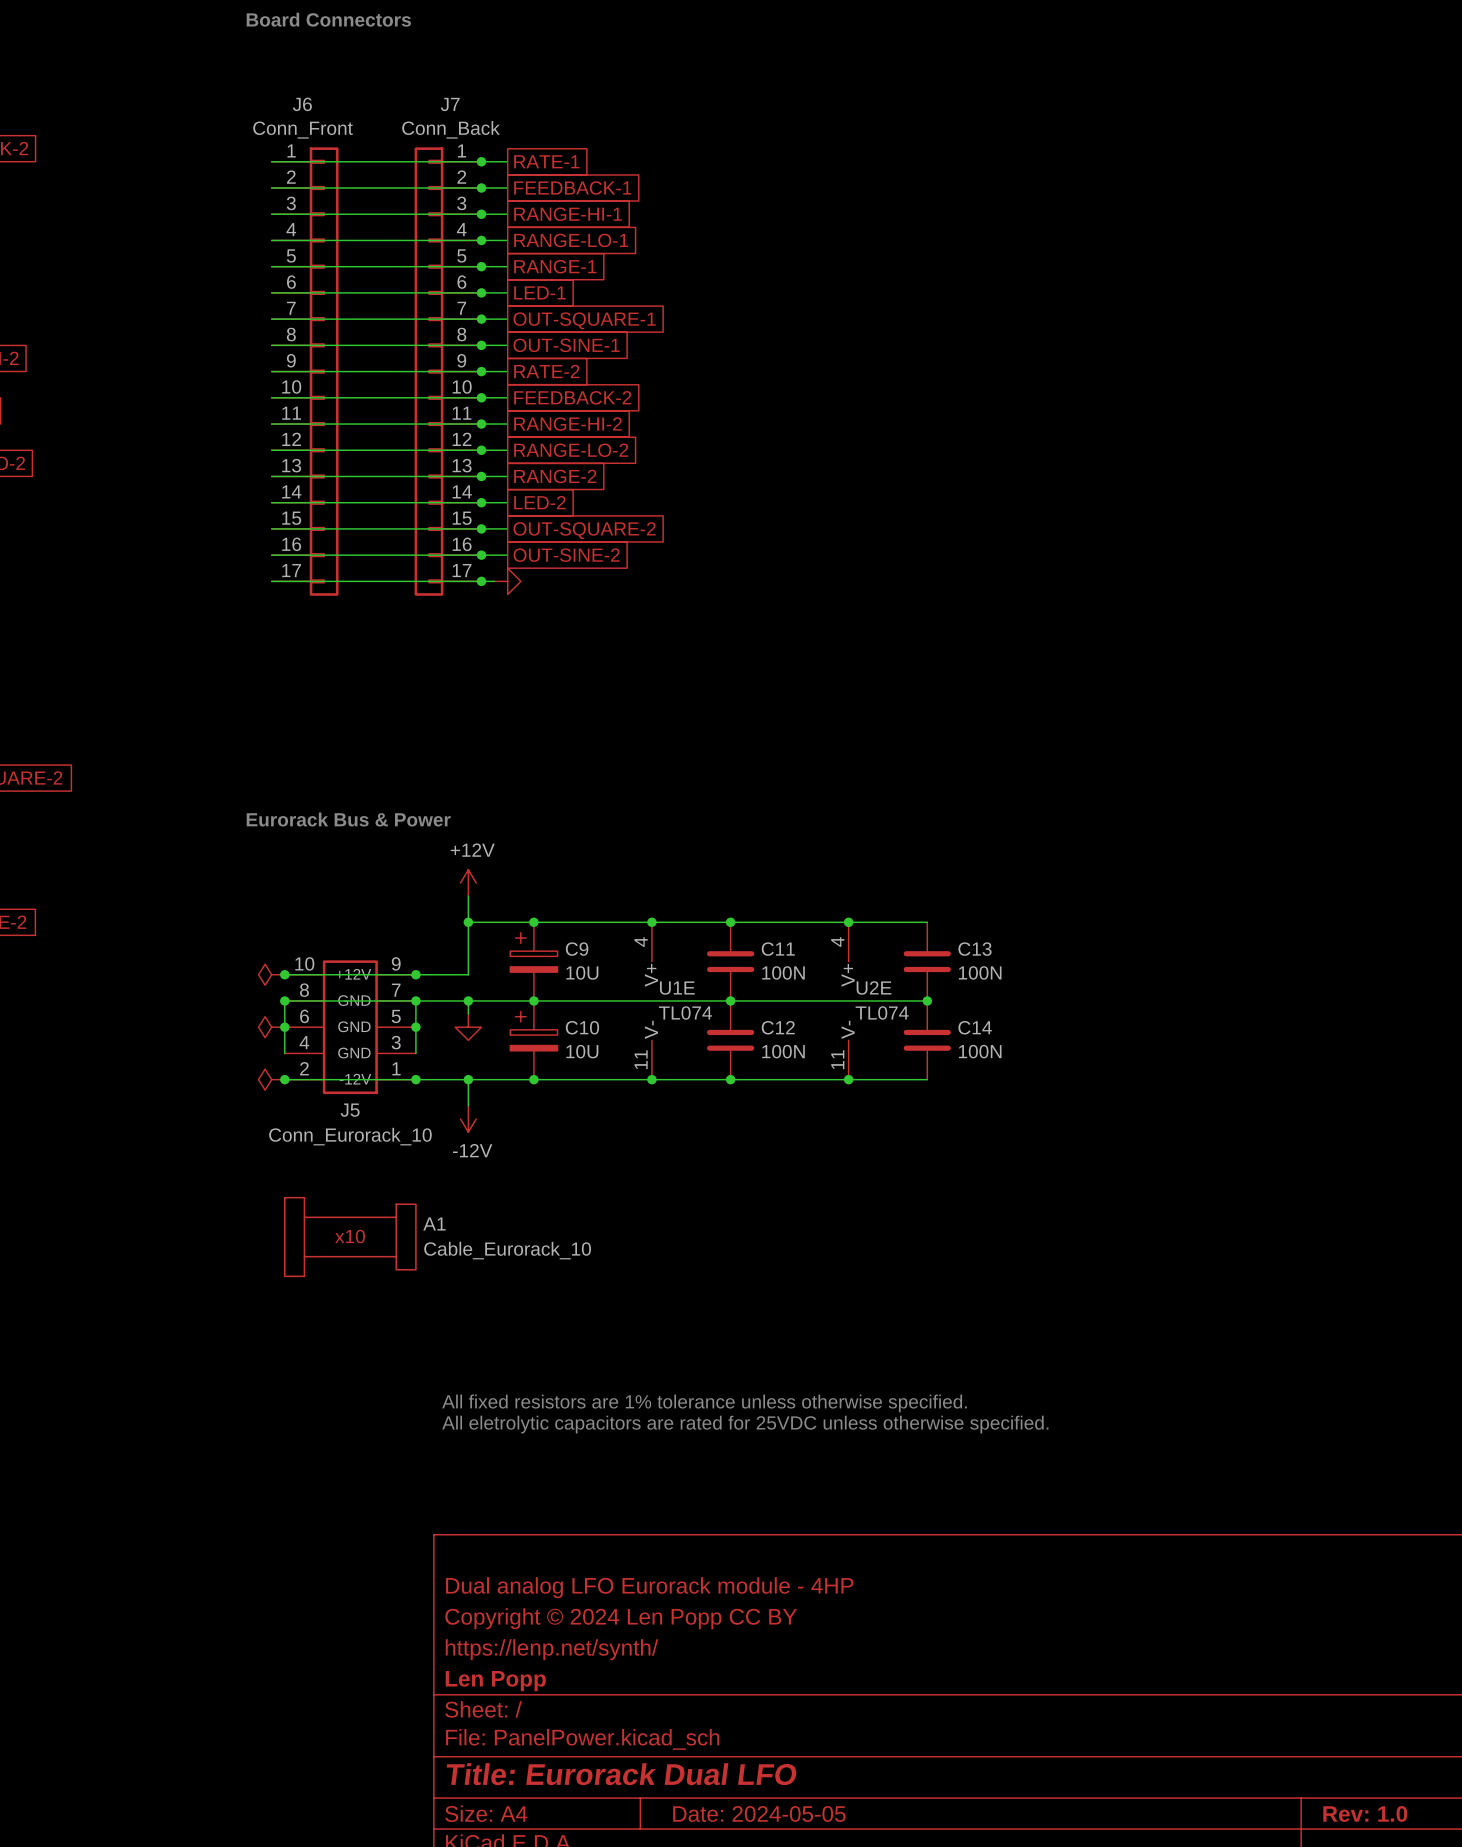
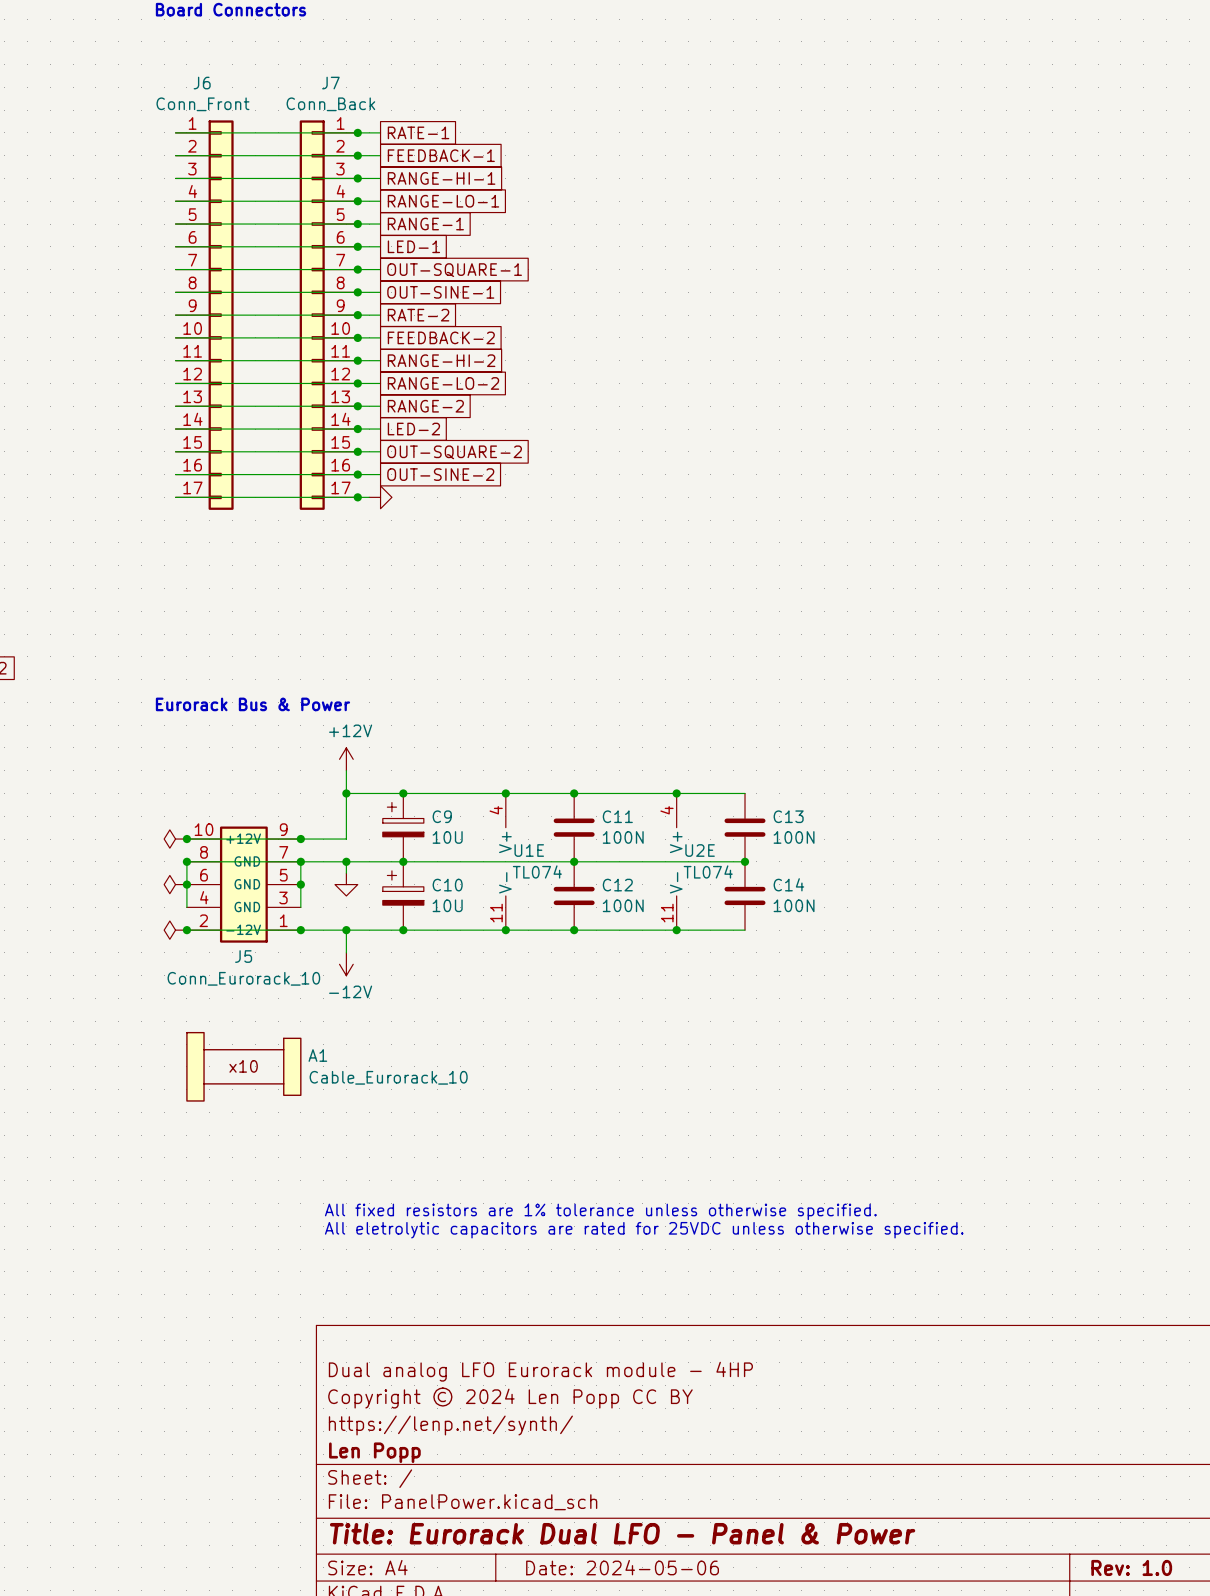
title block: Title: Eurorack Dual LFO (621, 1774) -> Title: Eurorack Dual LFO - Panel & Power (622, 1533)
title block: Date: 2024-05-05 (759, 1813) -> Date: 2024-05-06 (622, 1567)

